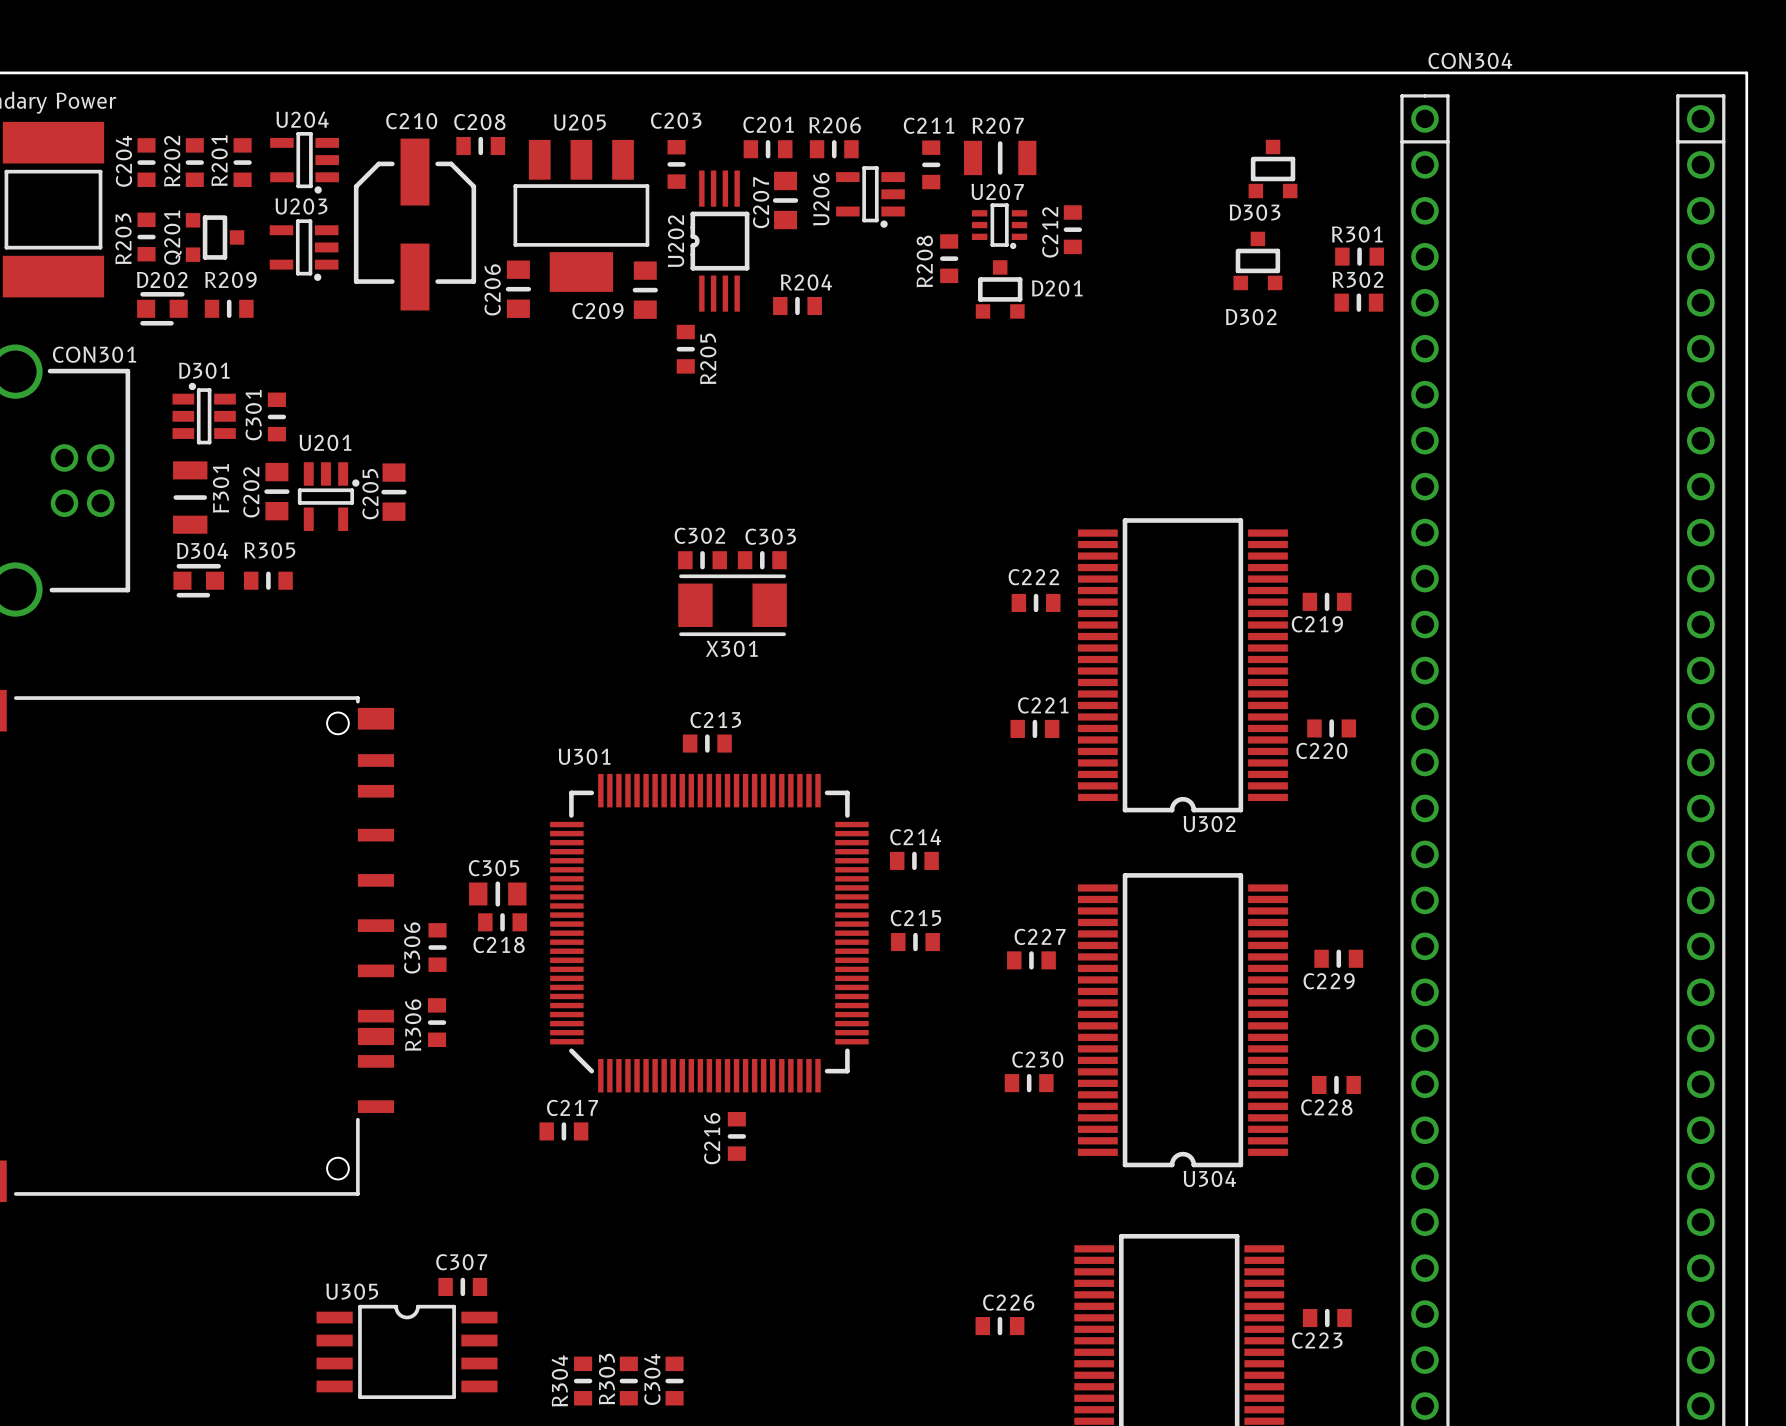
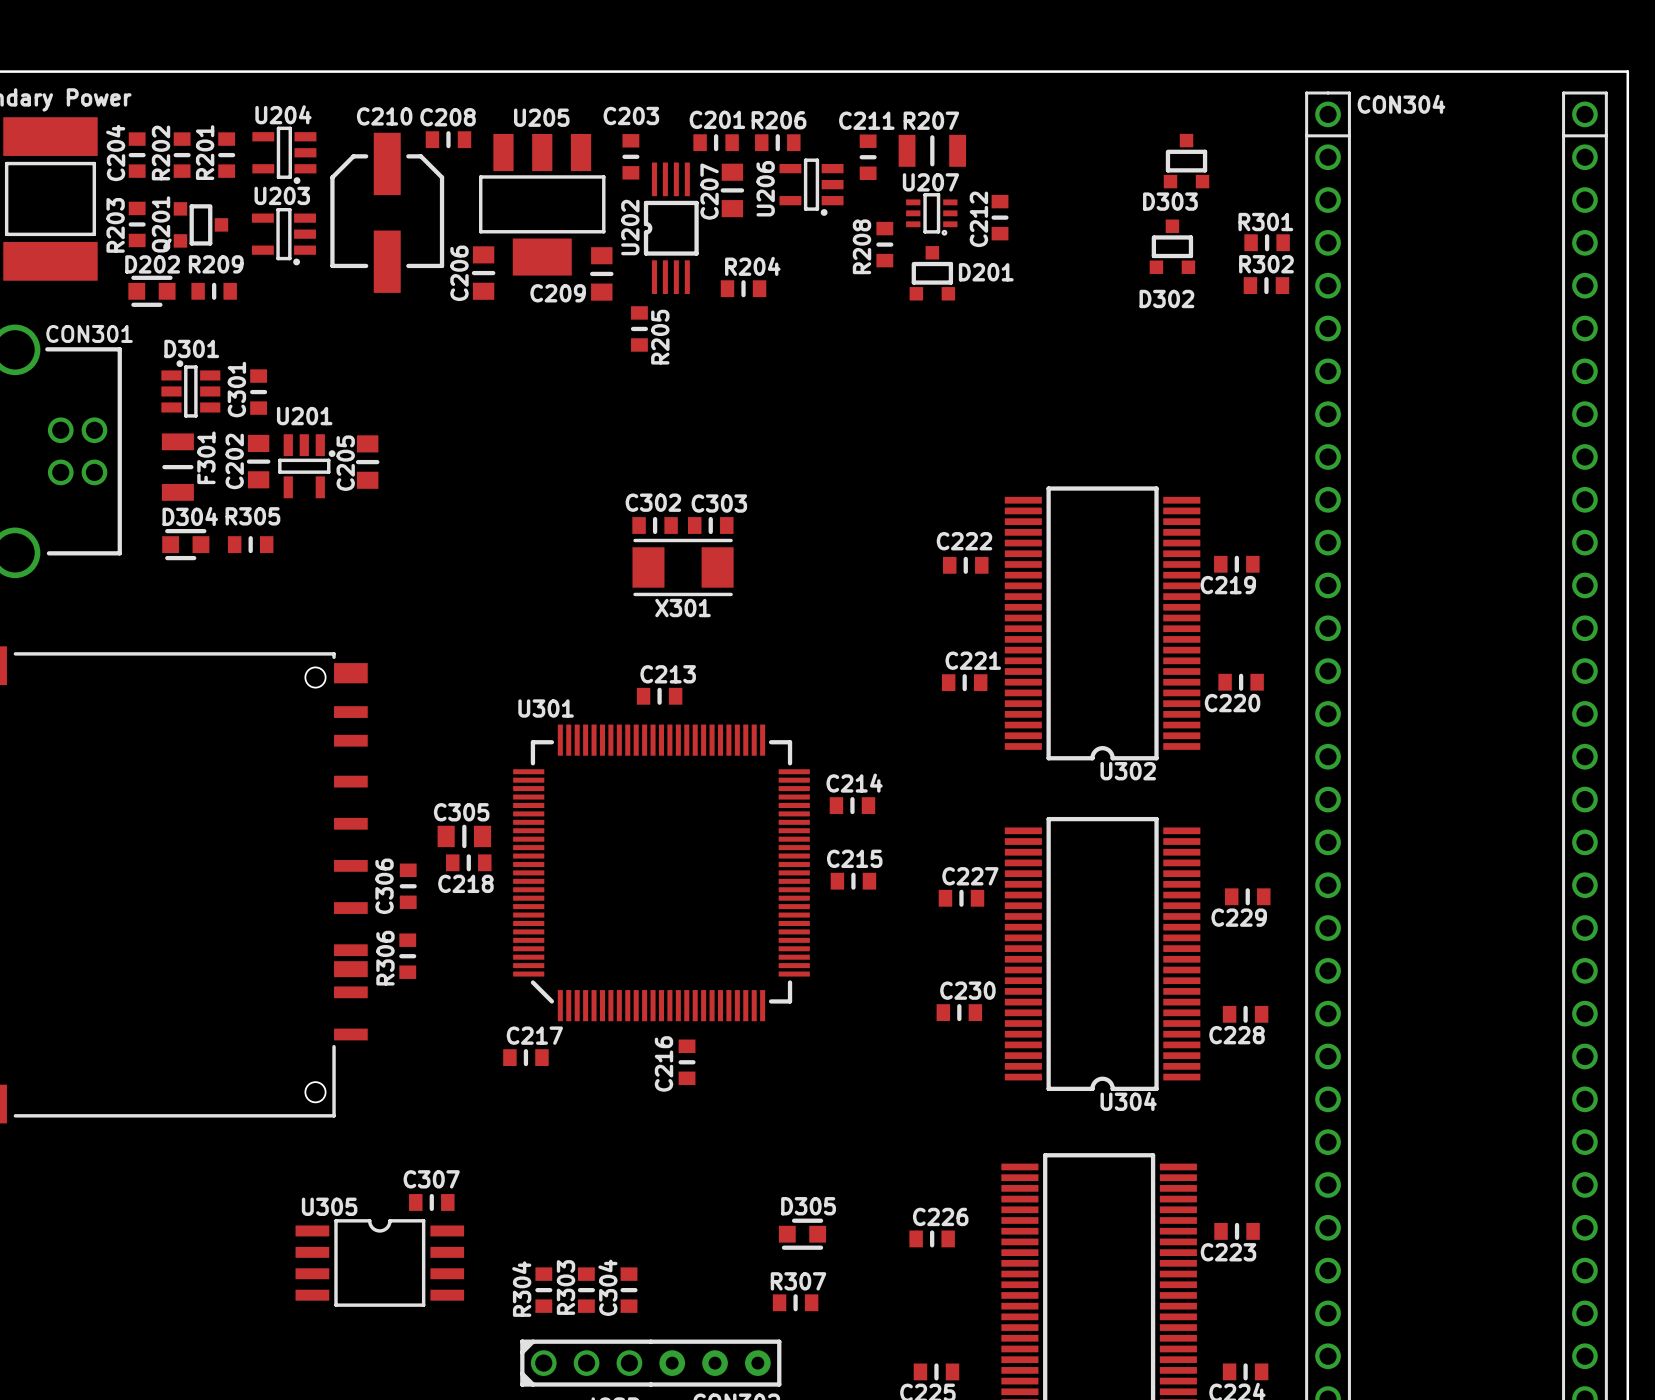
CON304 name position: CON304 (1470, 60) -> CON304 (1401, 104)
D305: none -> (802, 1234)
R307: none -> (795, 1302)

